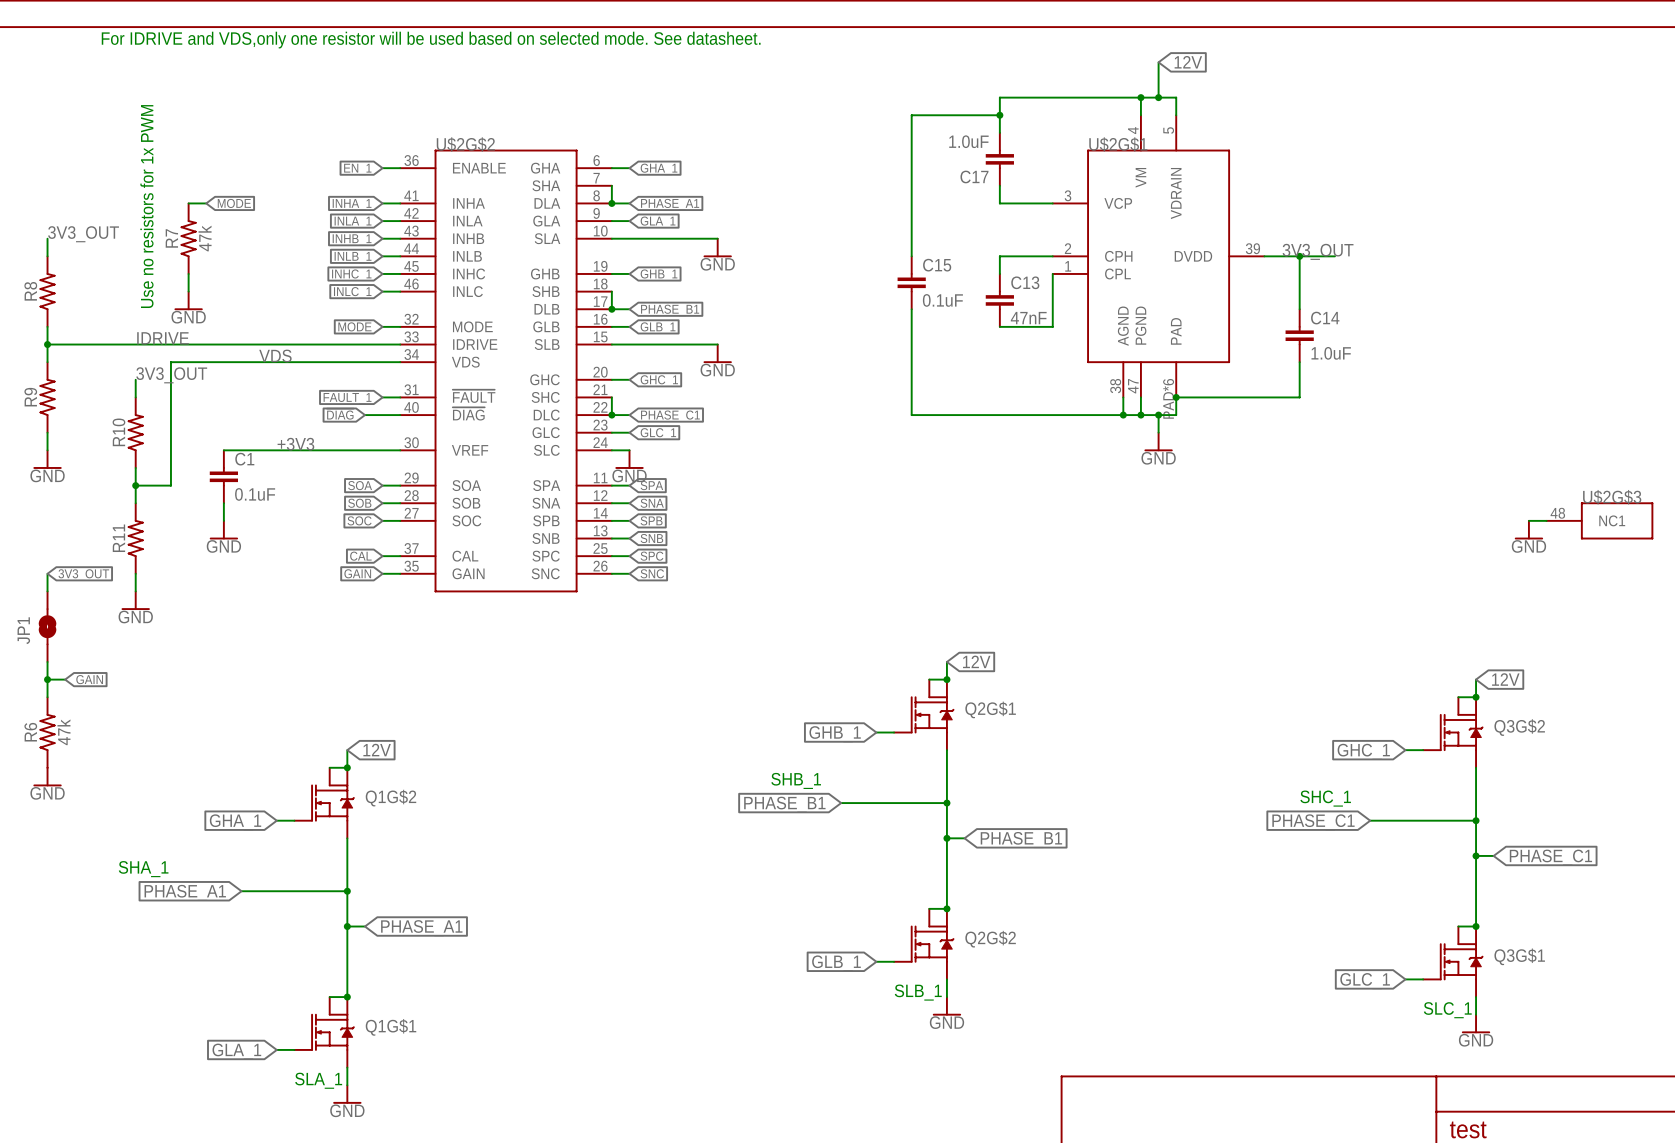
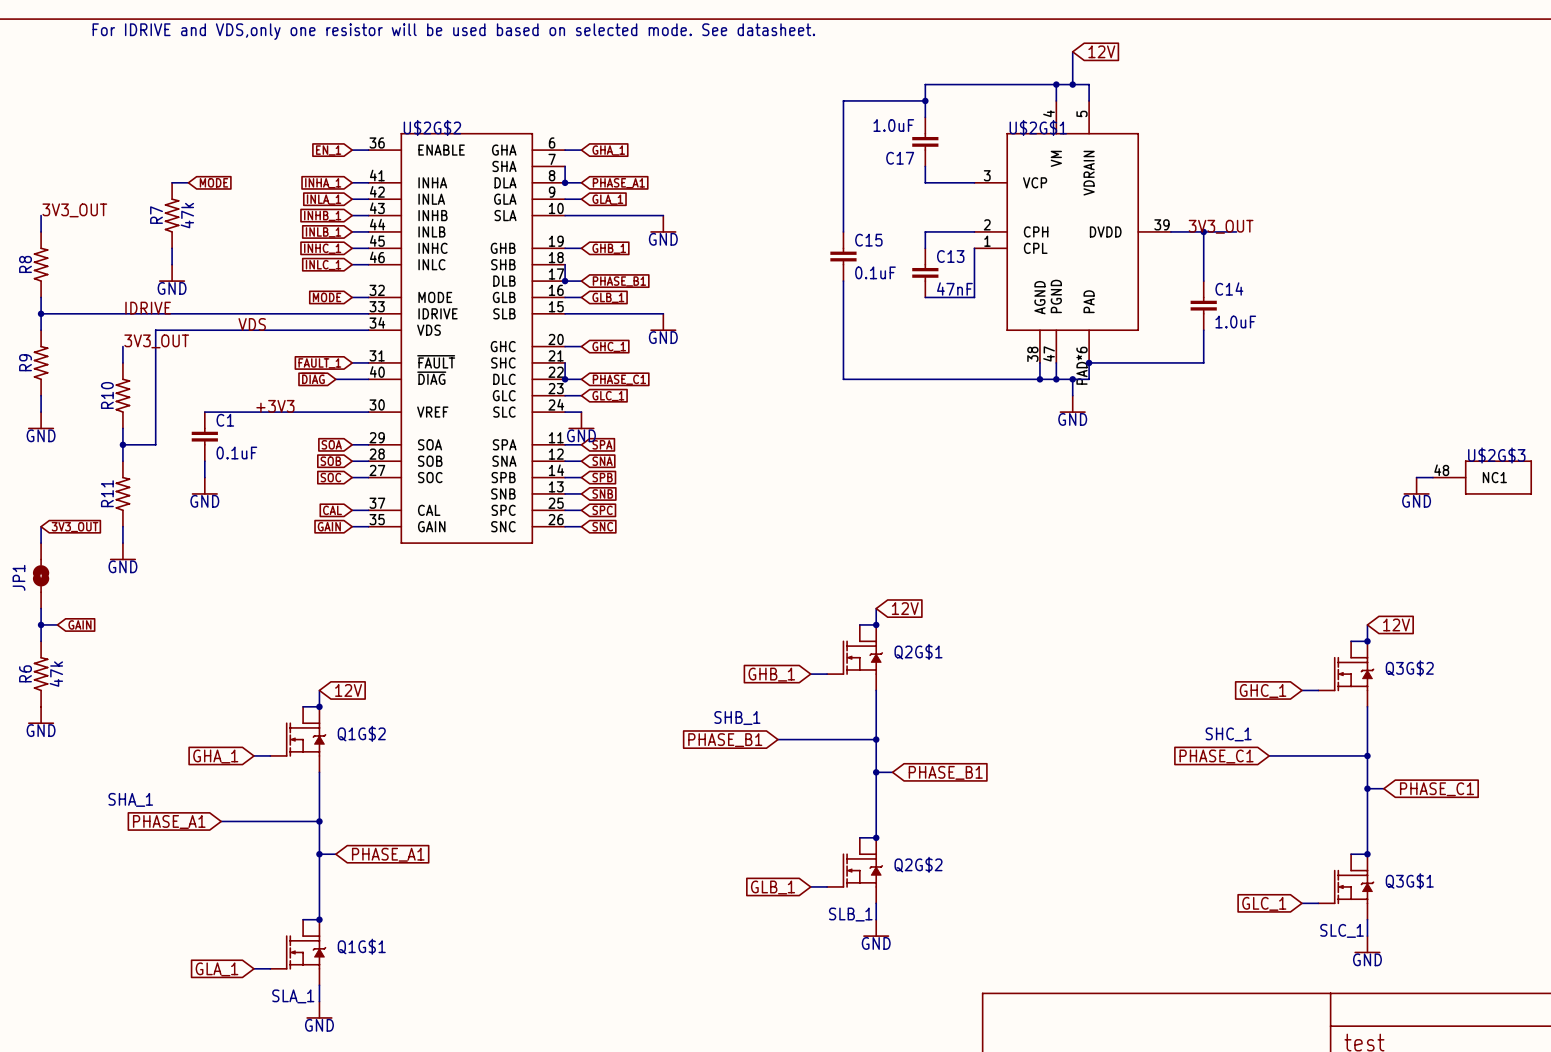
text: Use no resistors for 1x PWM (146, 206) -> none

